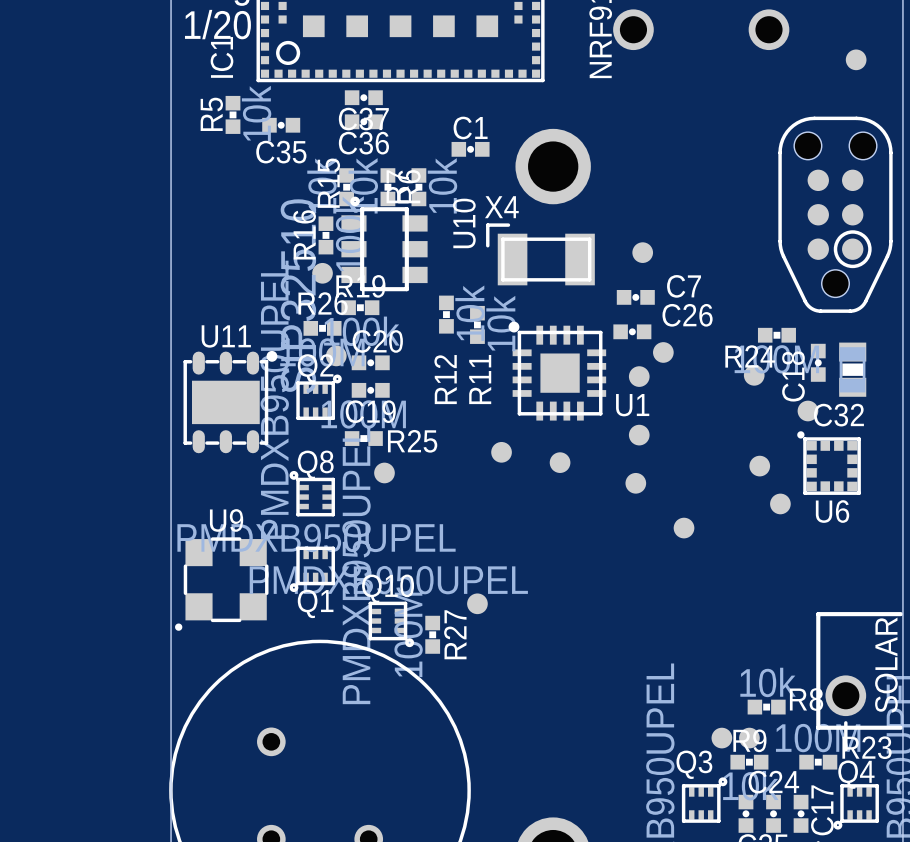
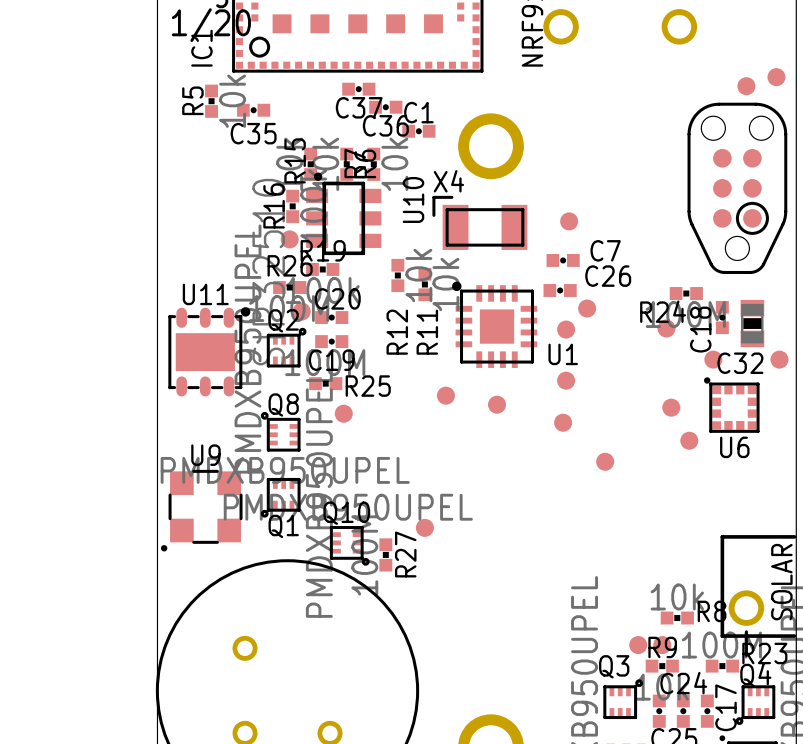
part: (856, 59) -> none
part: none -> (776, 77)
C37 position: (363, 97) -> (358, 89)
part: none -> (746, 86)
C36 position: (363, 121) -> (385, 107)
part: none -> (779, 359)

